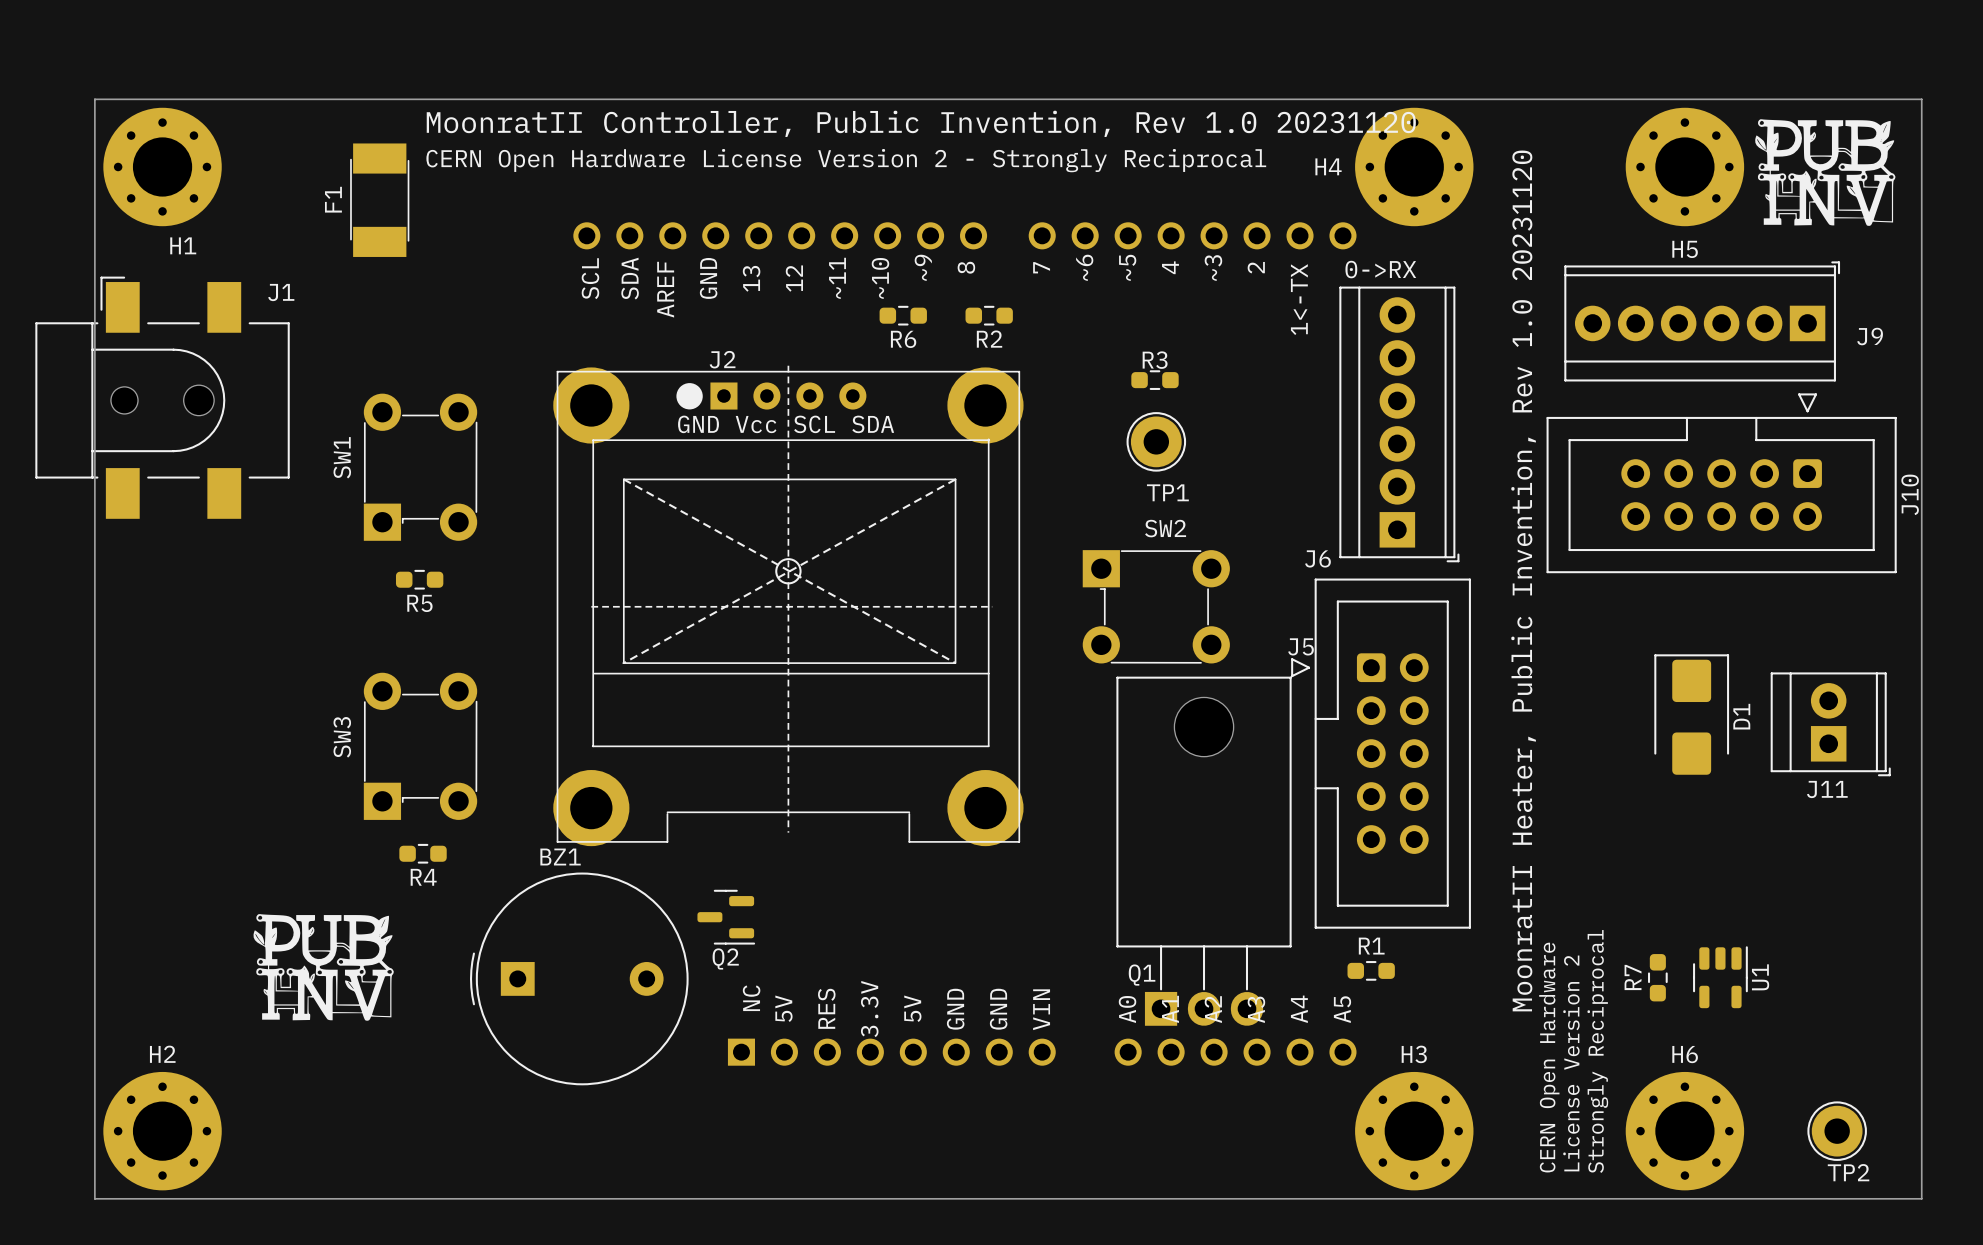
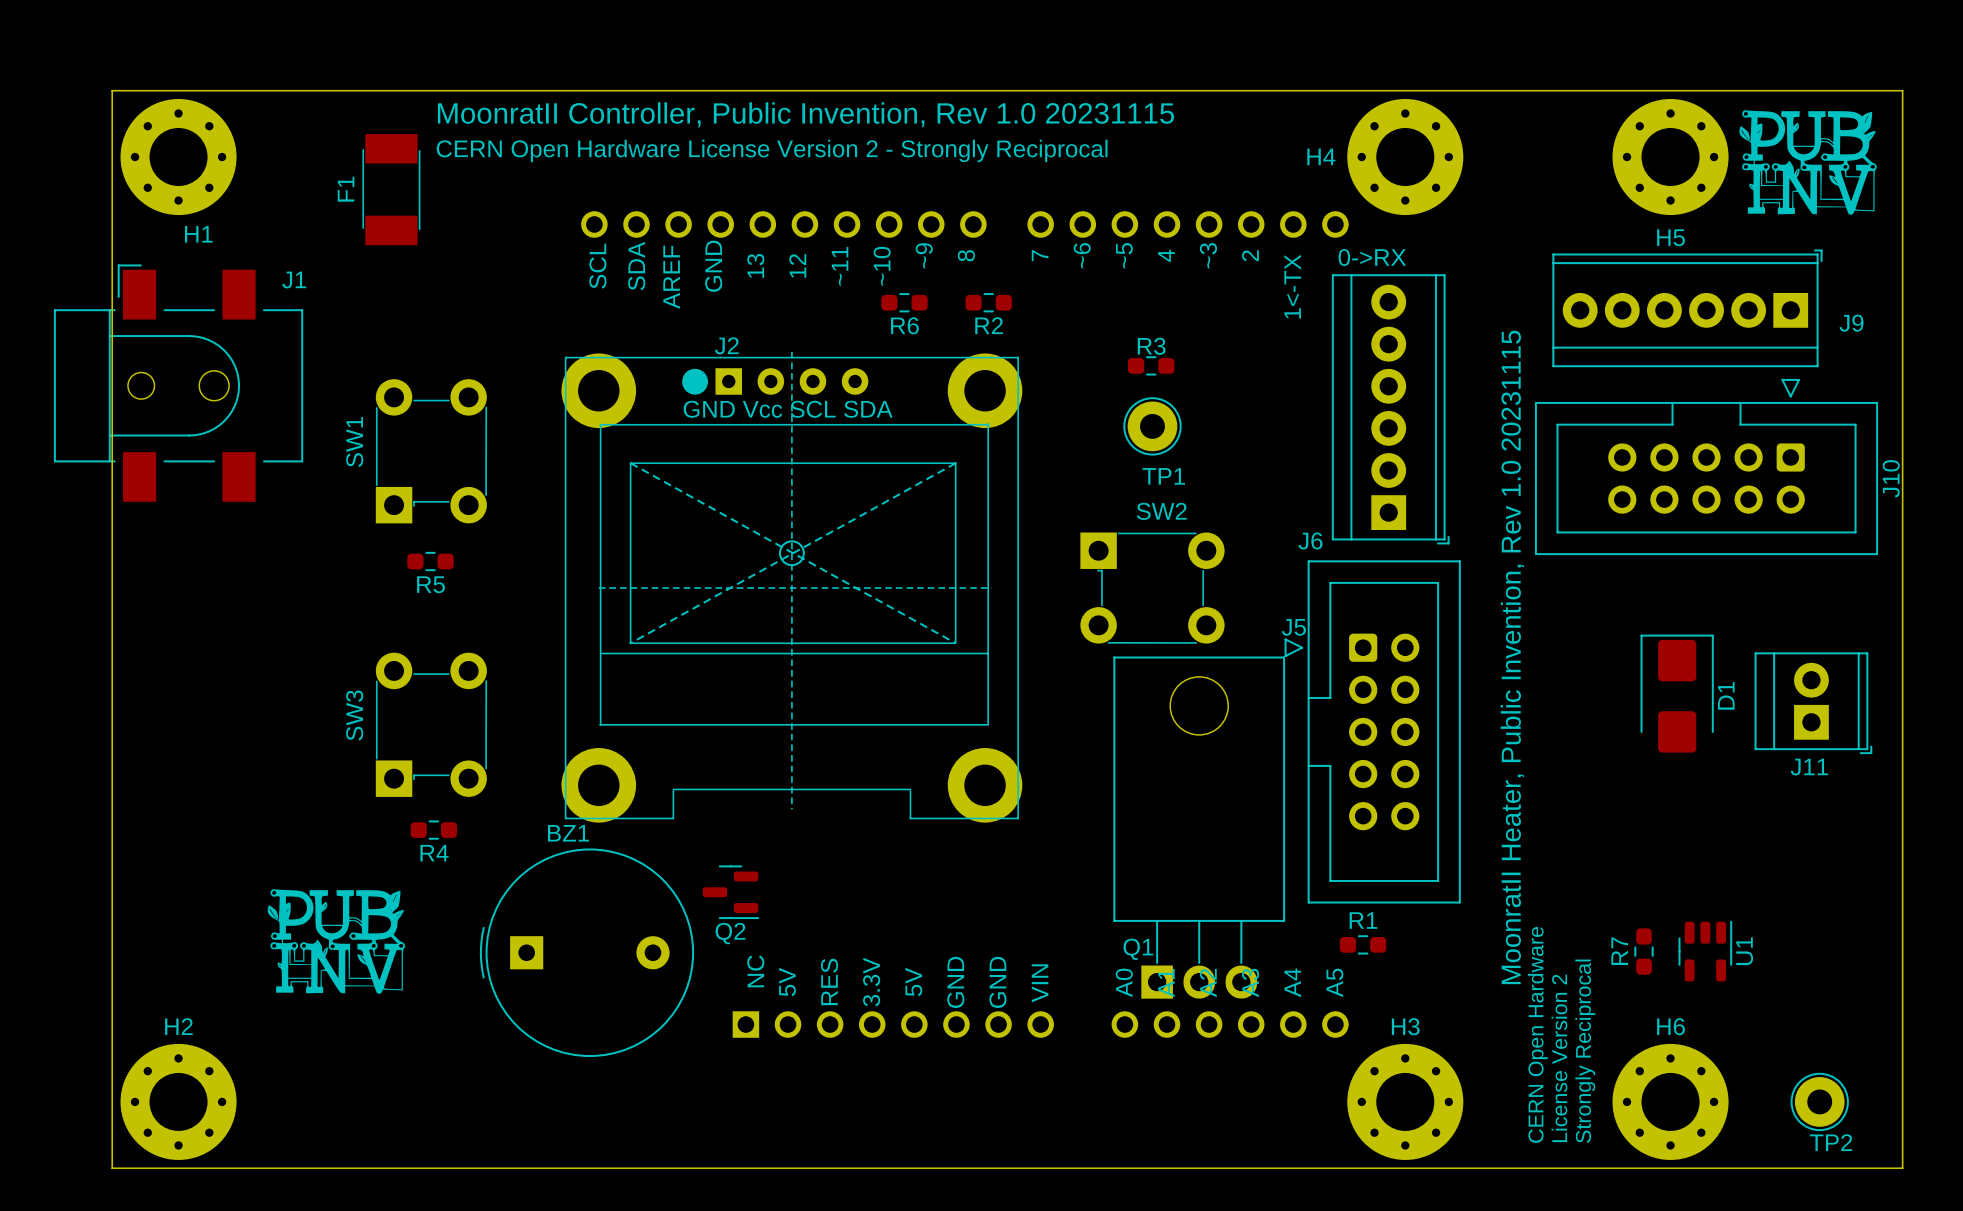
text: MoonratII Controller, Public Invention, Rev 1.0 20231120 (921, 123) -> MoonratII Controller, Public Invention, Rev 1.0 20231115 (805, 114)
text: MoonratII Heater, Public Invention, Rev 1.0 20231120 (1523, 580) -> MoonratII Heater, Public Invention, Rev 1.0 20231115 (1512, 657)

